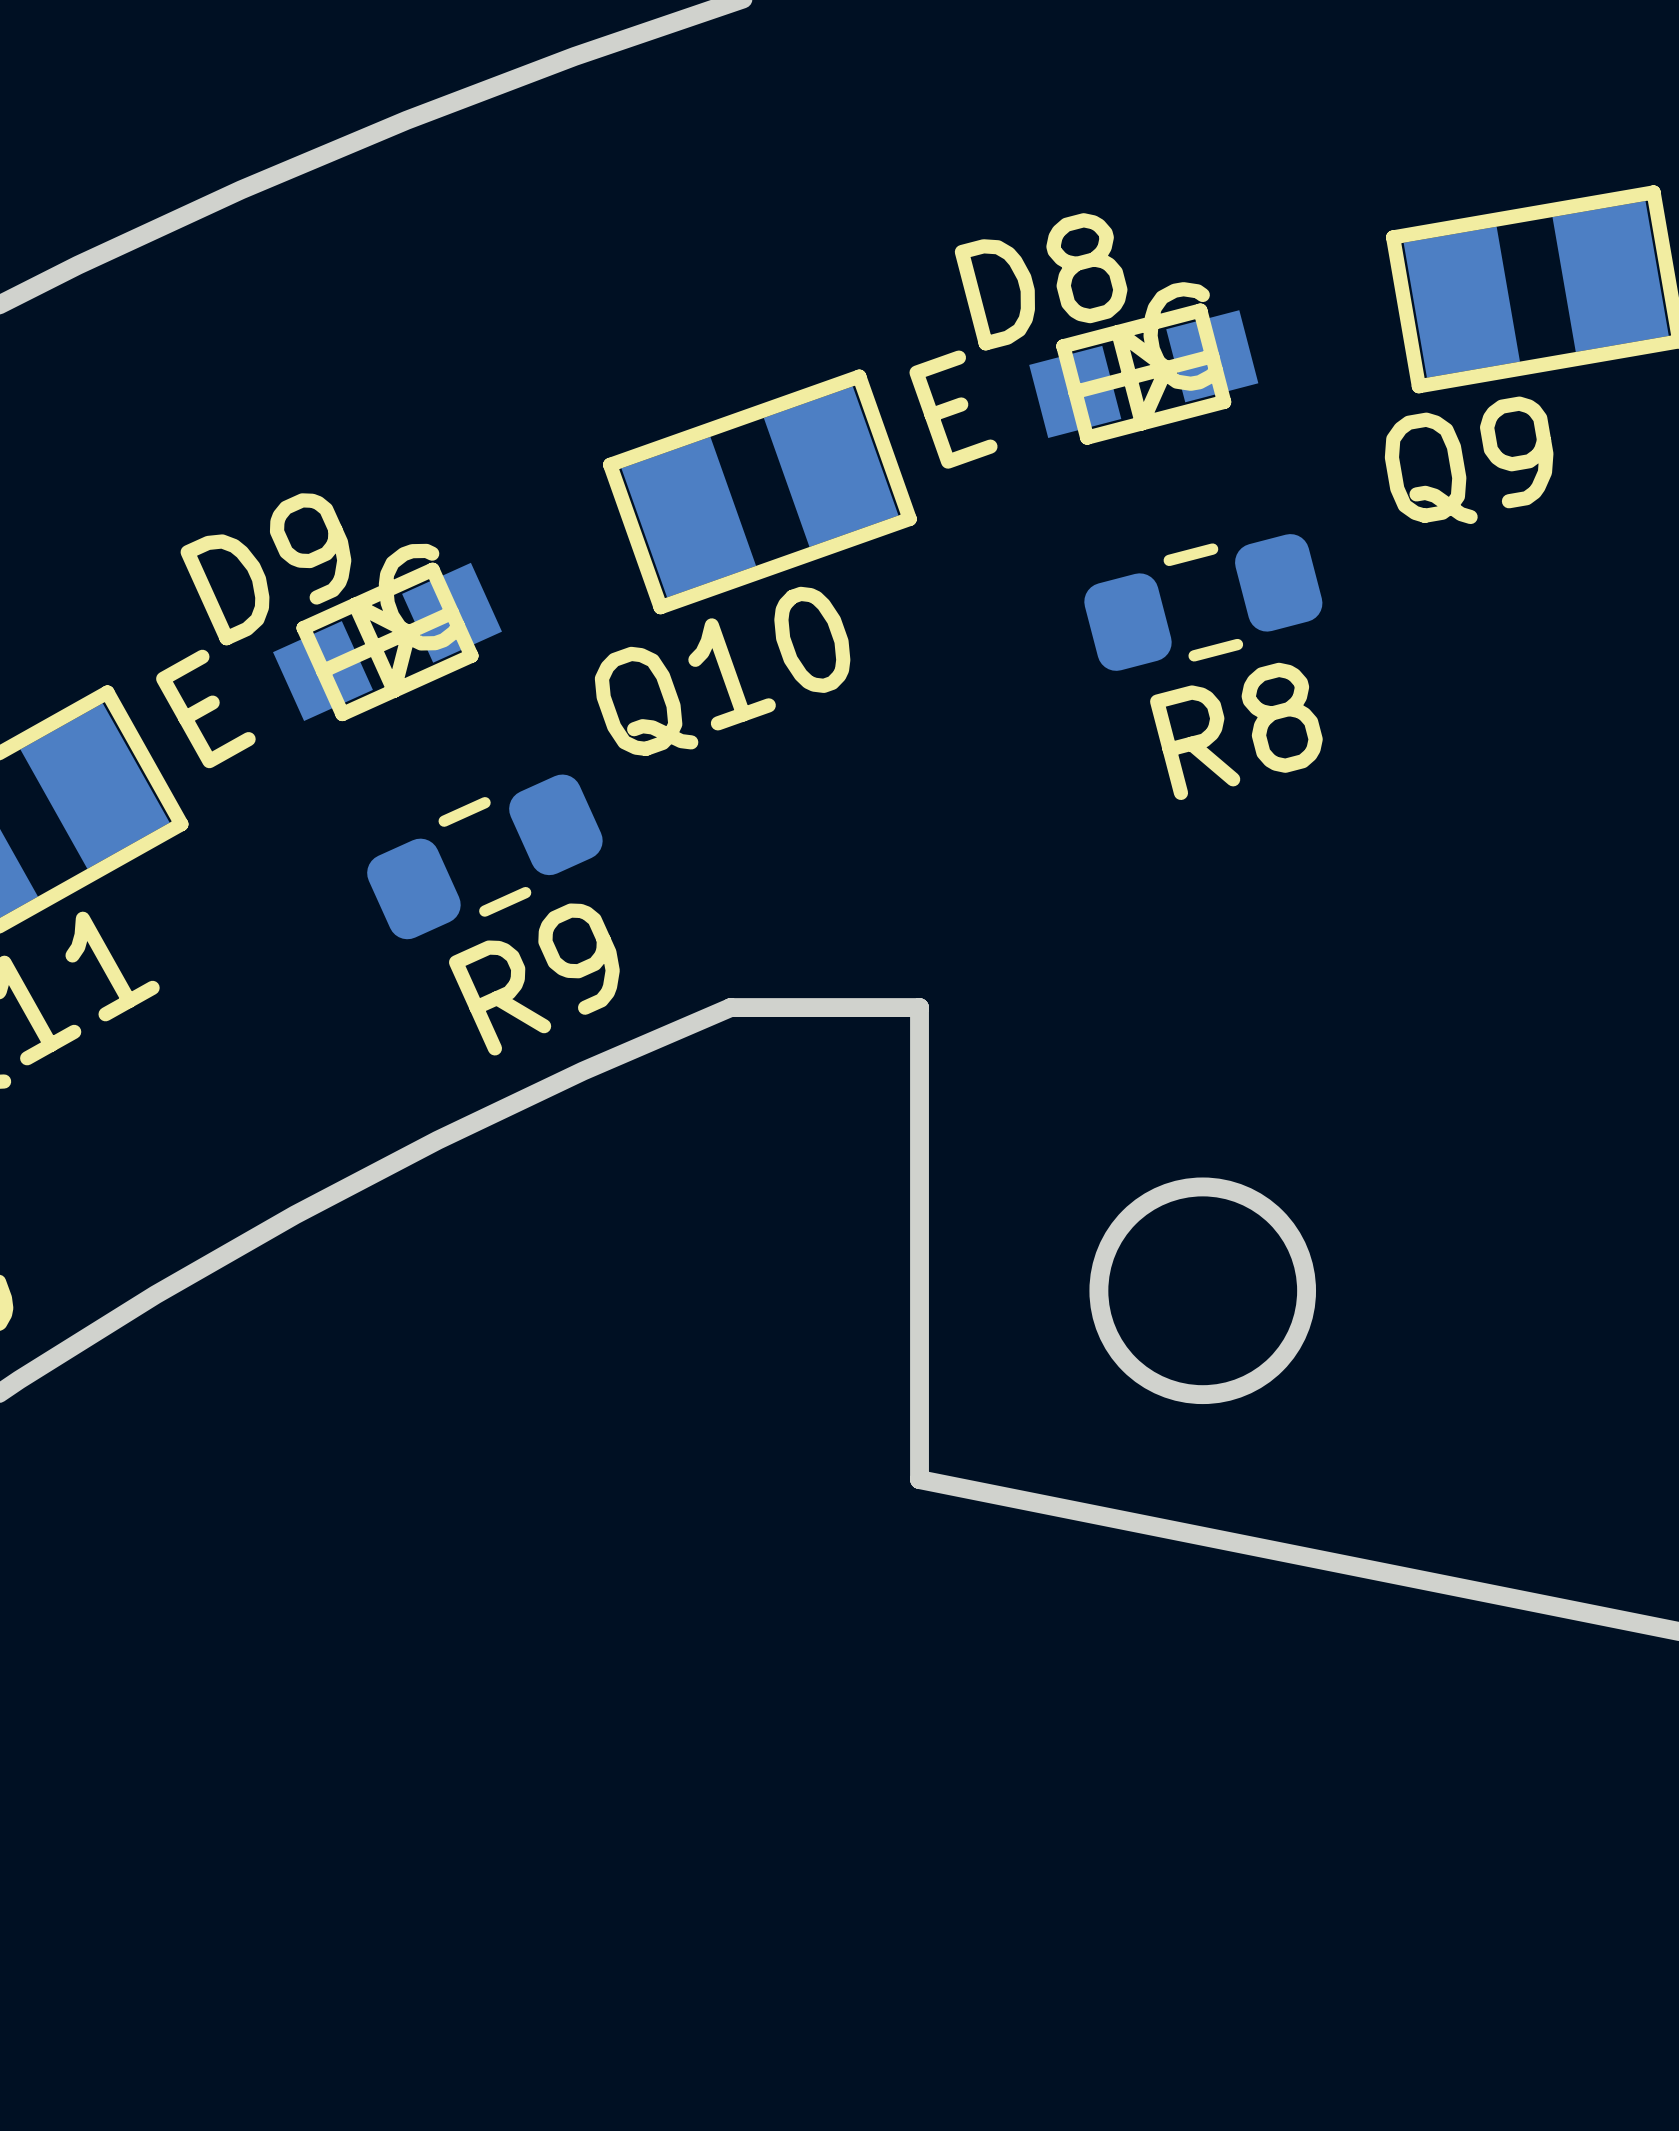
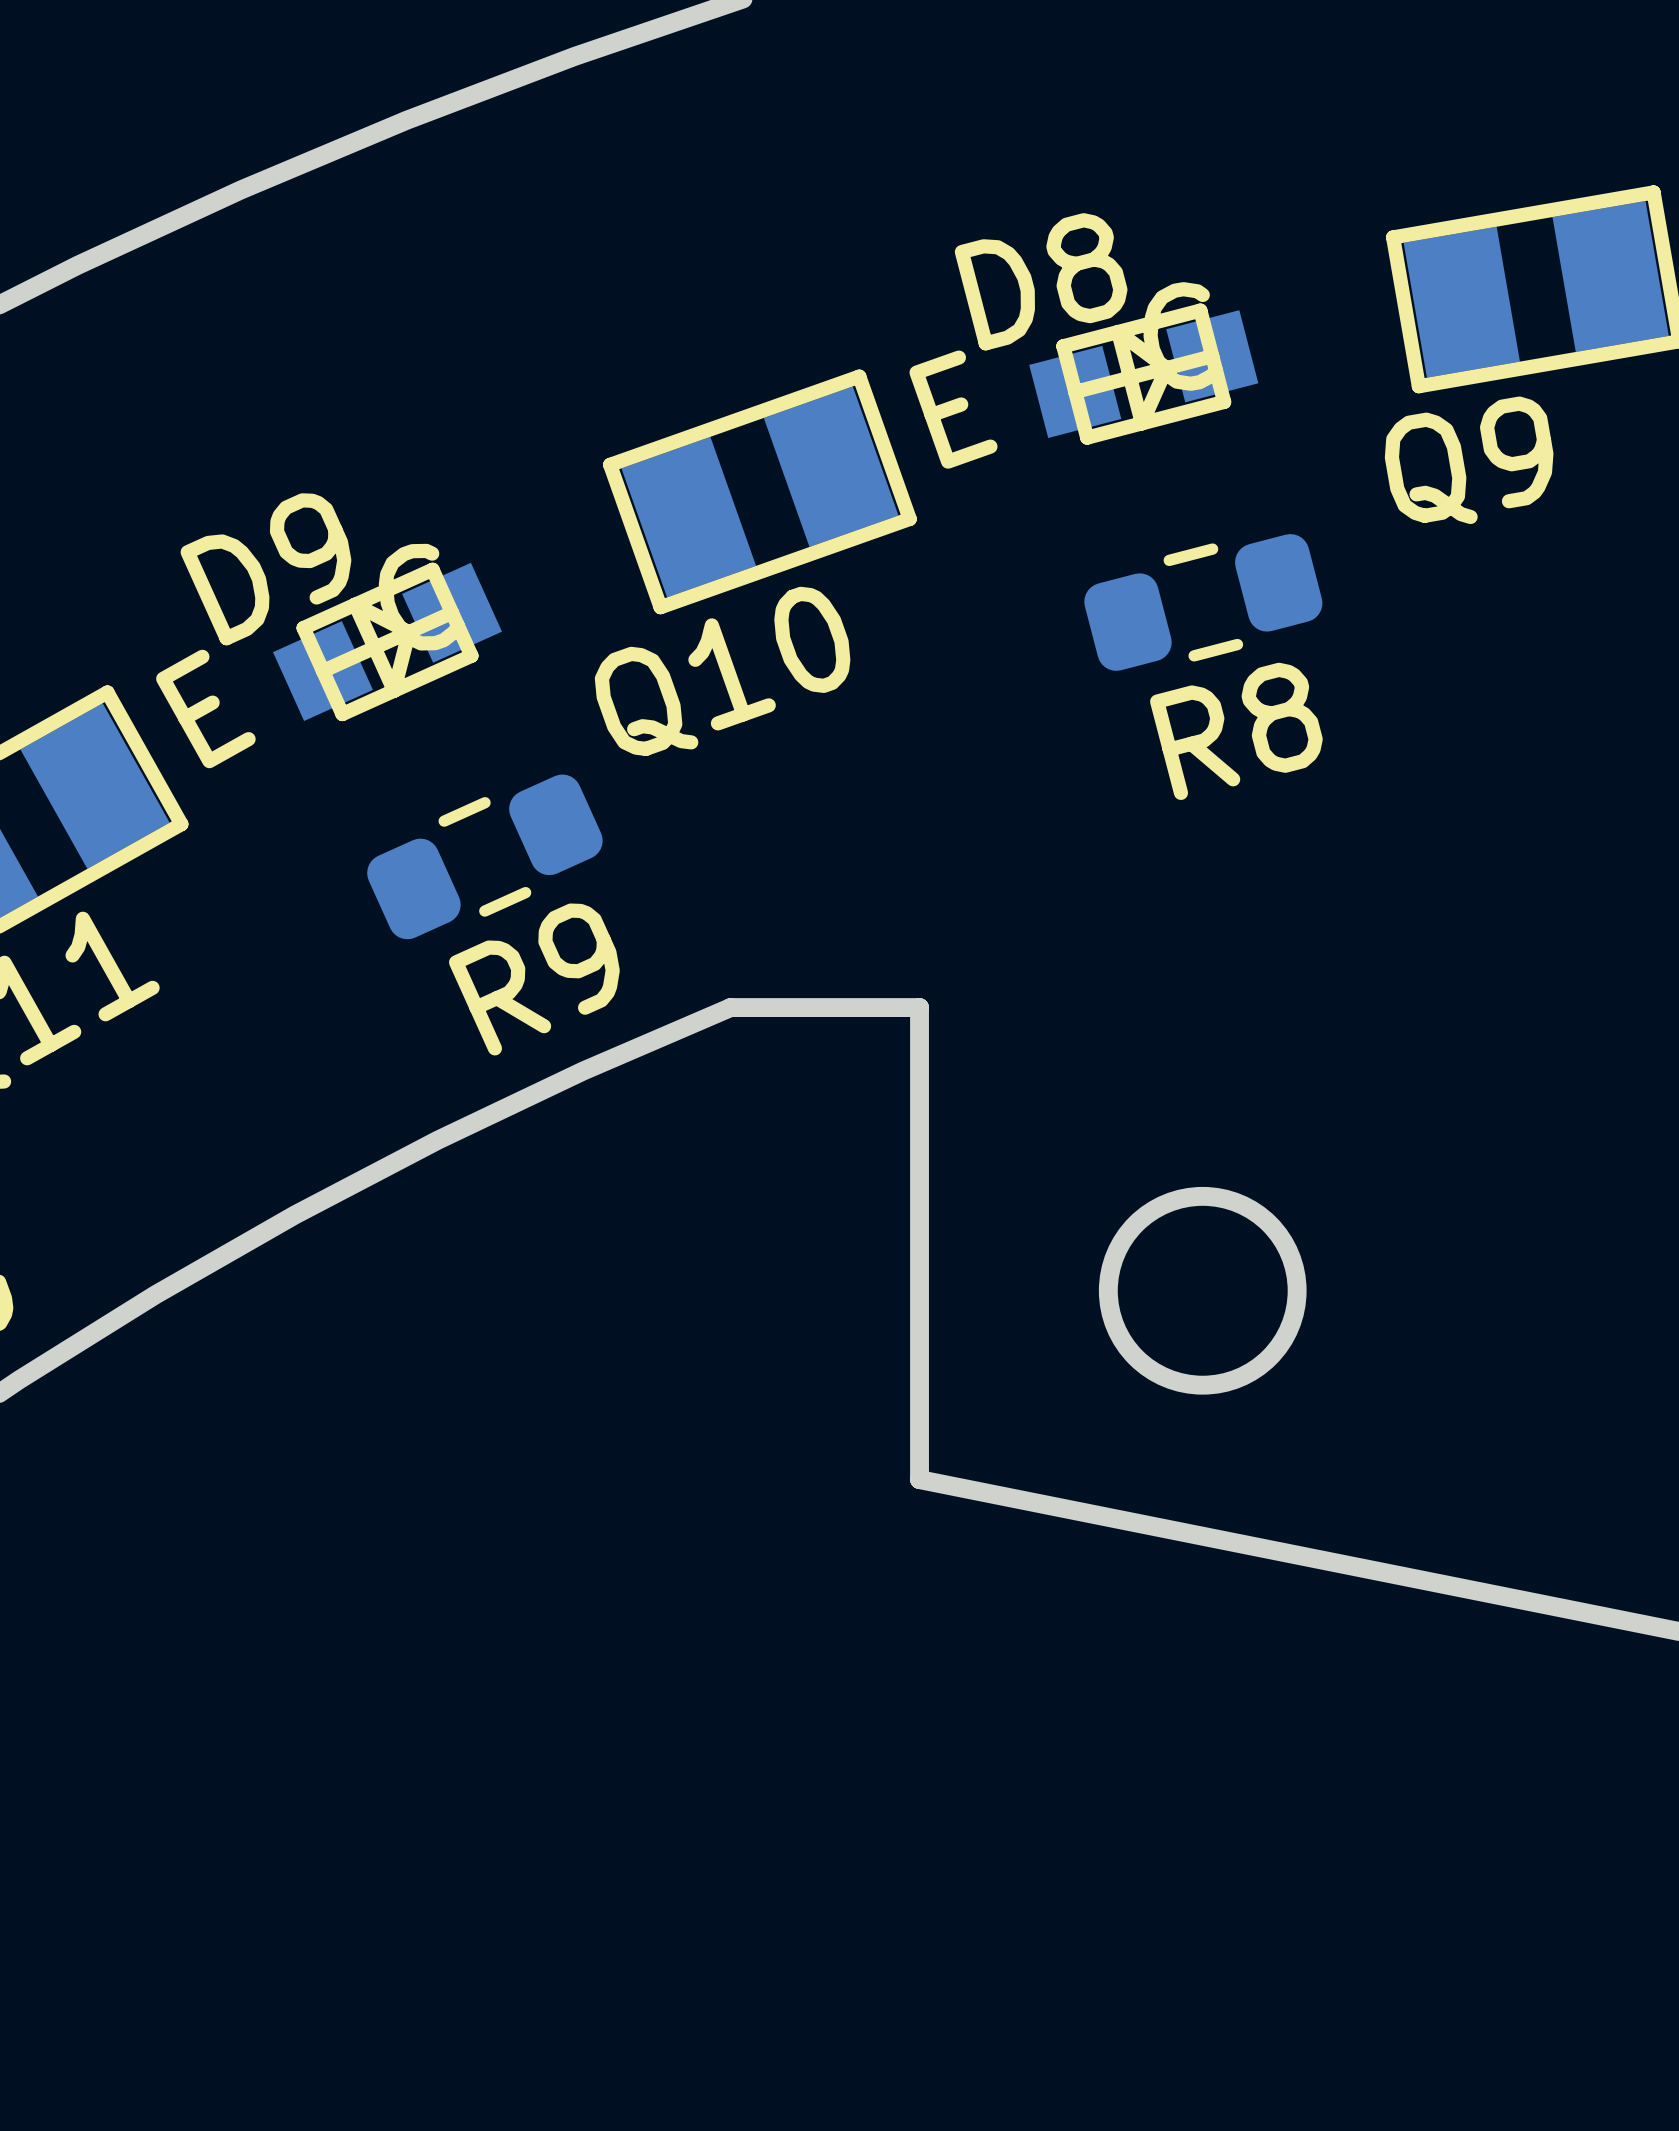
round board edge size: [1089, 1177, 1317, 1405] -> [1098, 1186, 1307, 1395]

